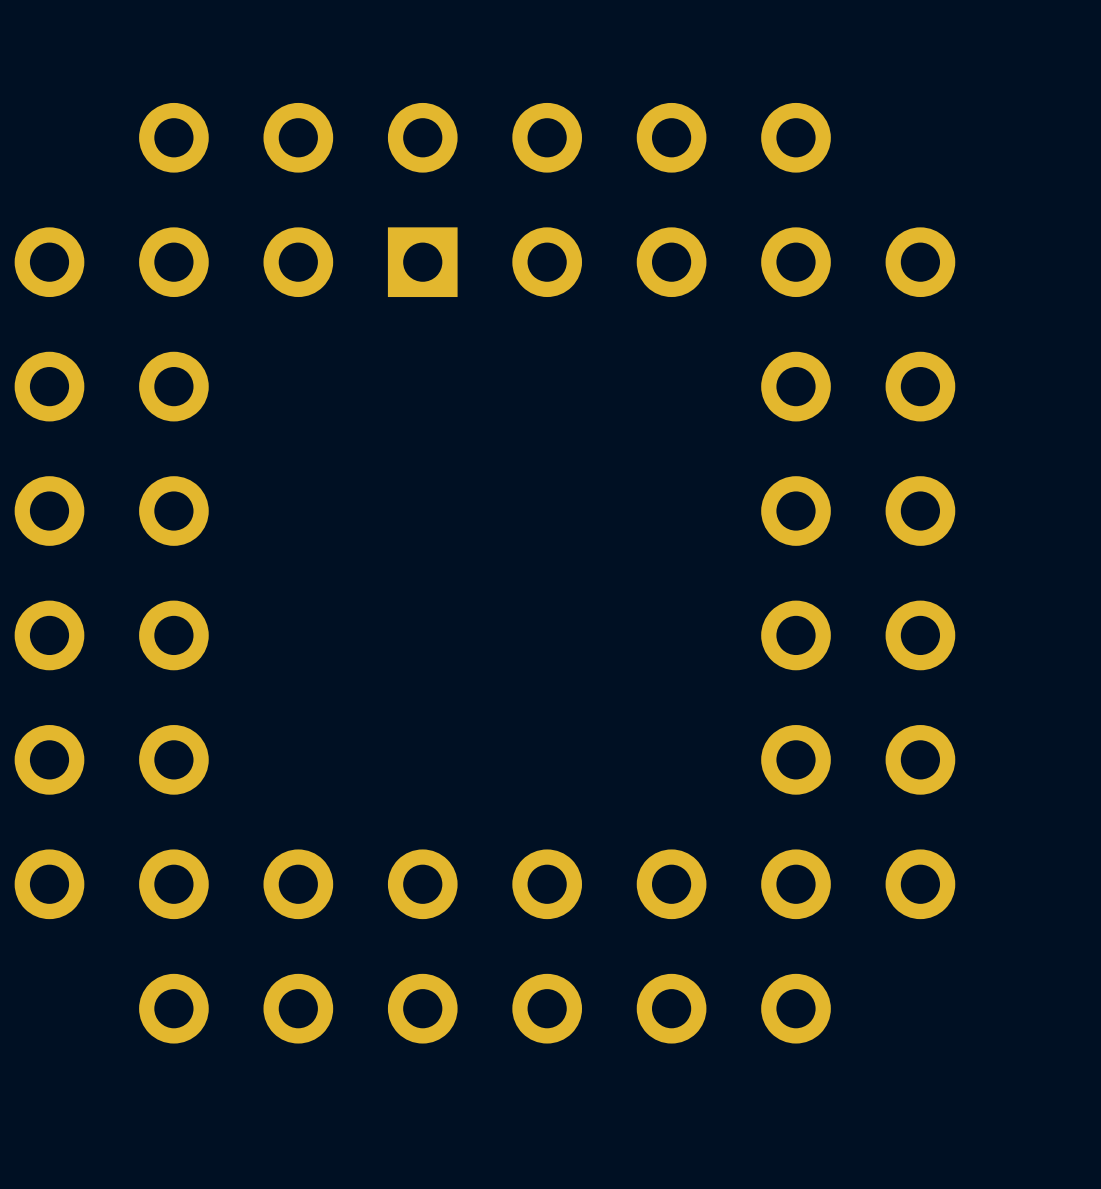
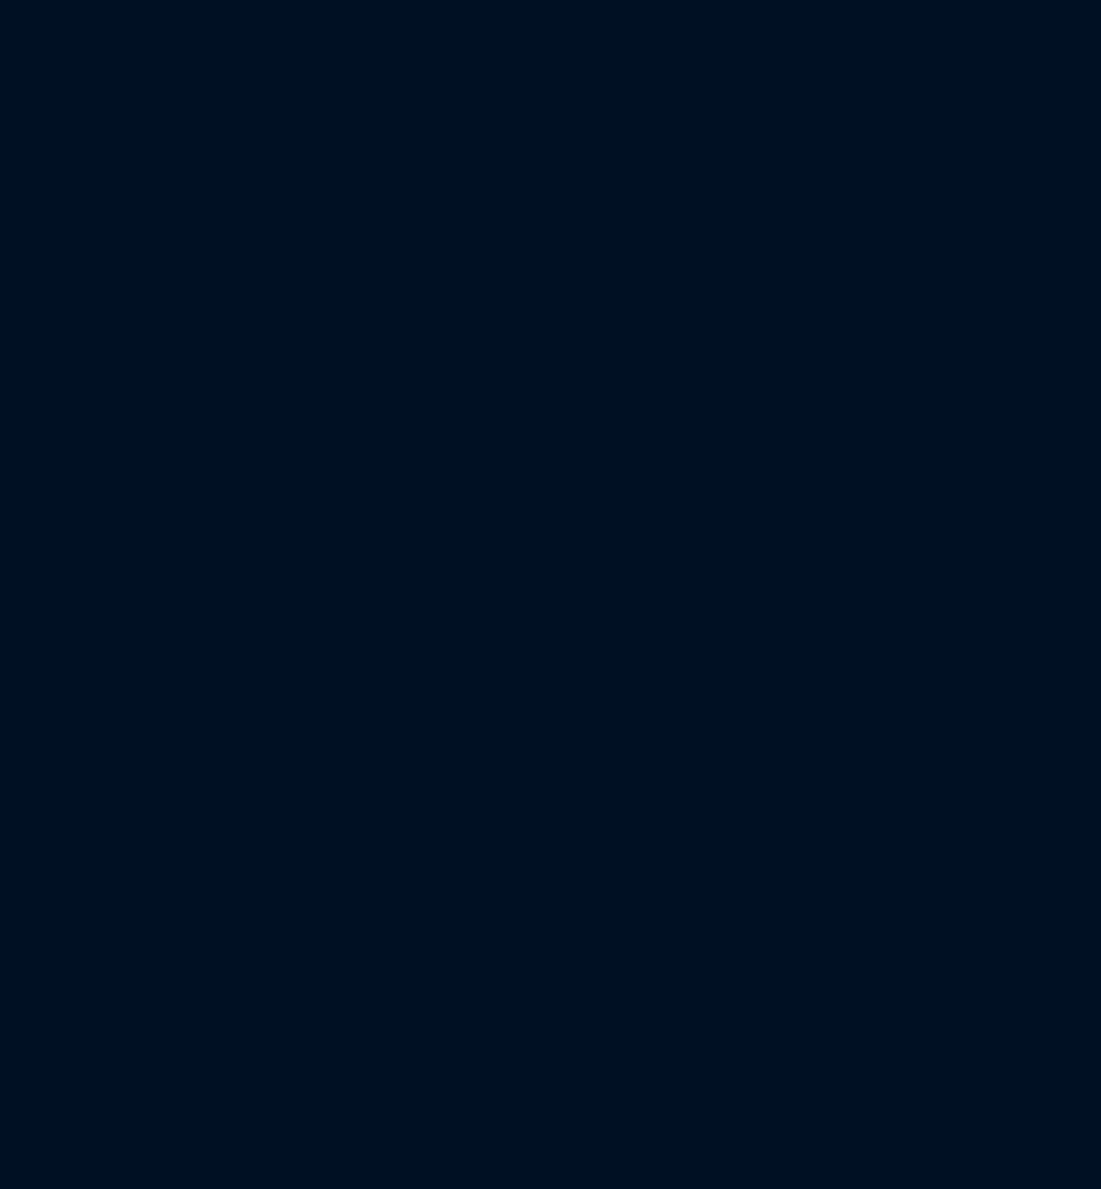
part: (484, 573) -> none

